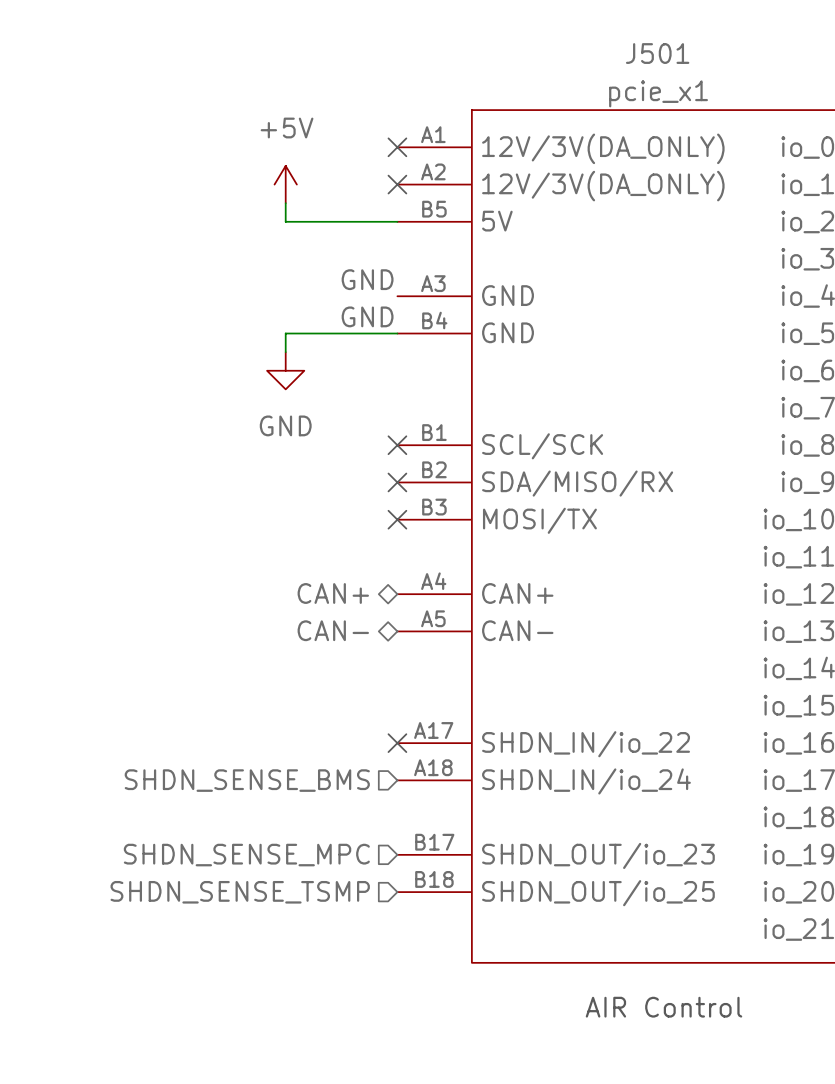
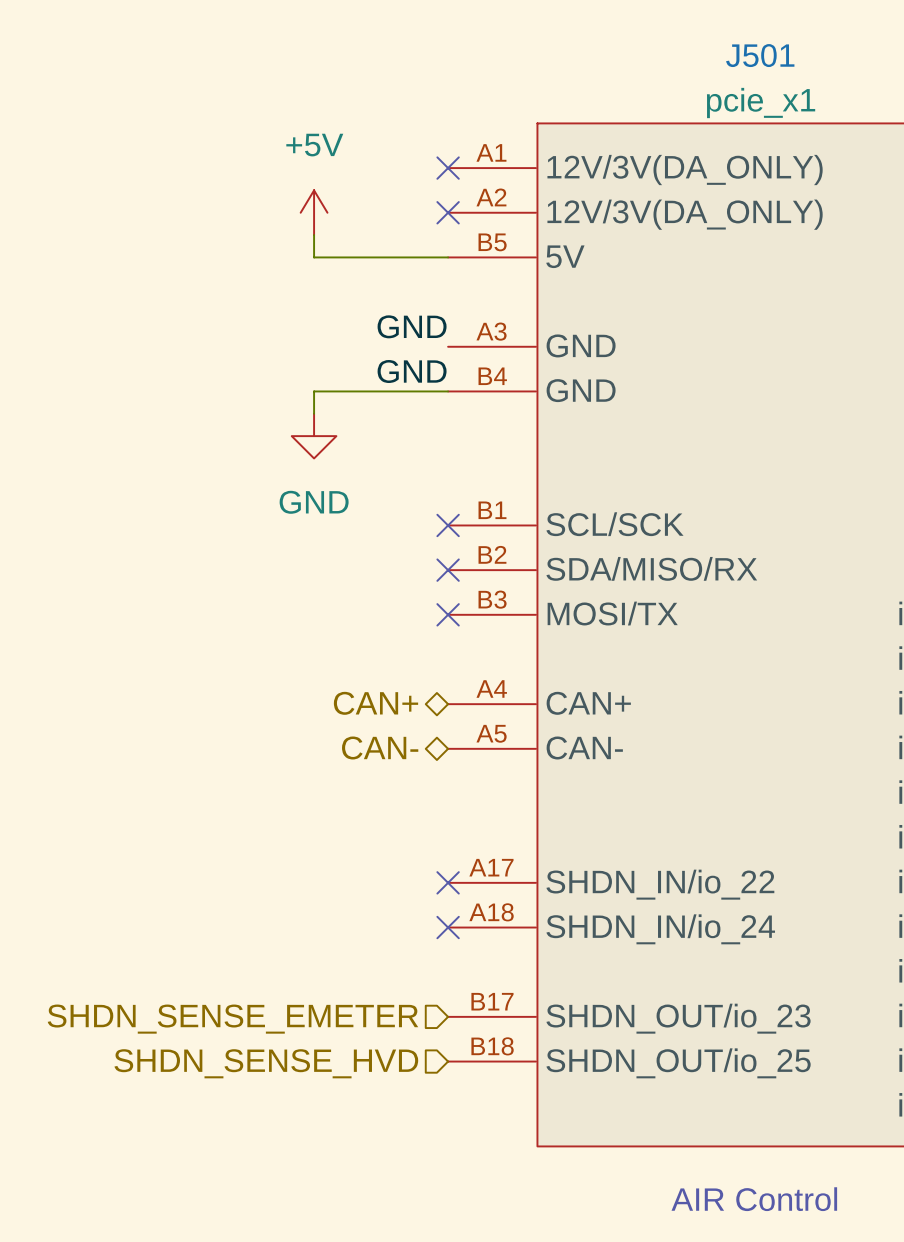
hierarchical label: SHDN_SENSE_BMS (247, 780) -> none
no-connect mark: none -> (448, 927)
hierarchical label: SHDN_SENSE_MPC (246, 855) -> SHDN_SENSE_EMETER (232, 1019)
hierarchical label: SHDN_SENSE_TSMP (240, 892) -> SHDN_SENSE_HVD (266, 1063)

